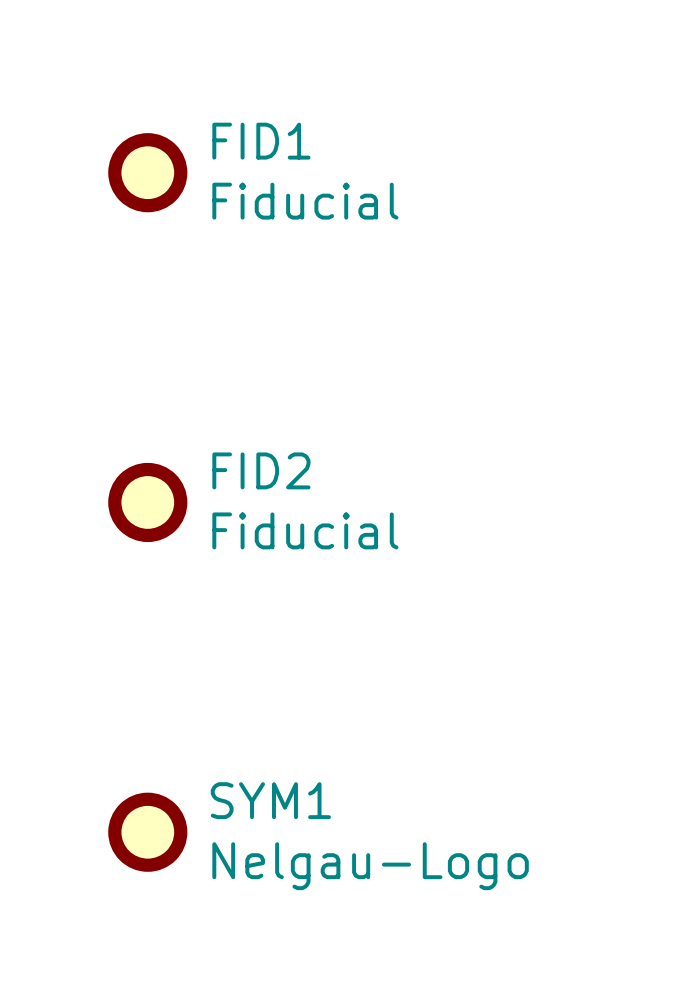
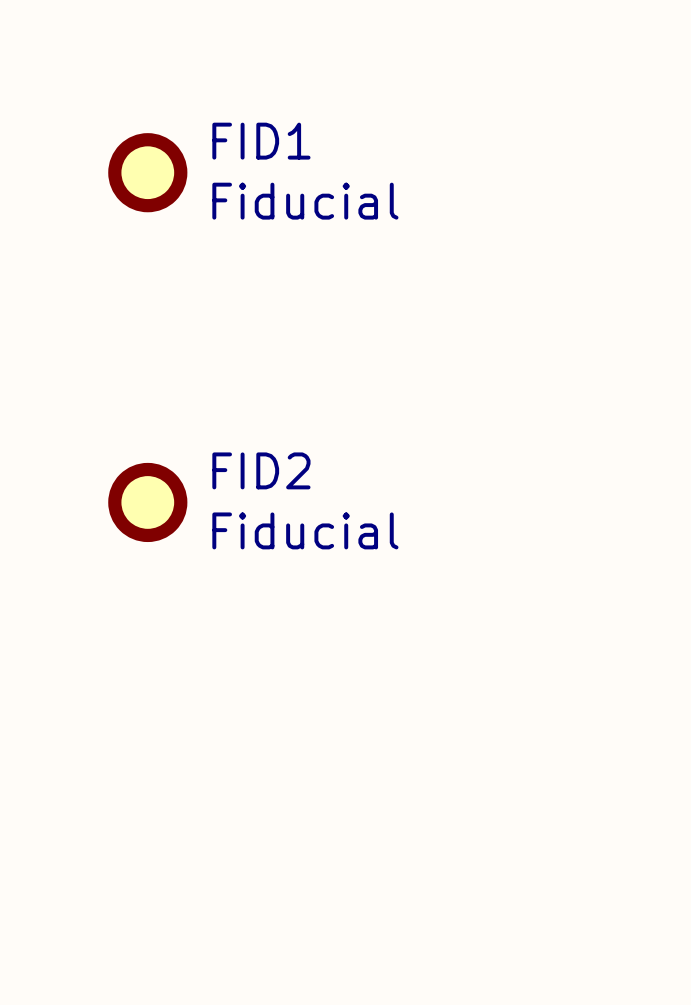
SYM1: Nelgau-Logo (147, 832) -> none

